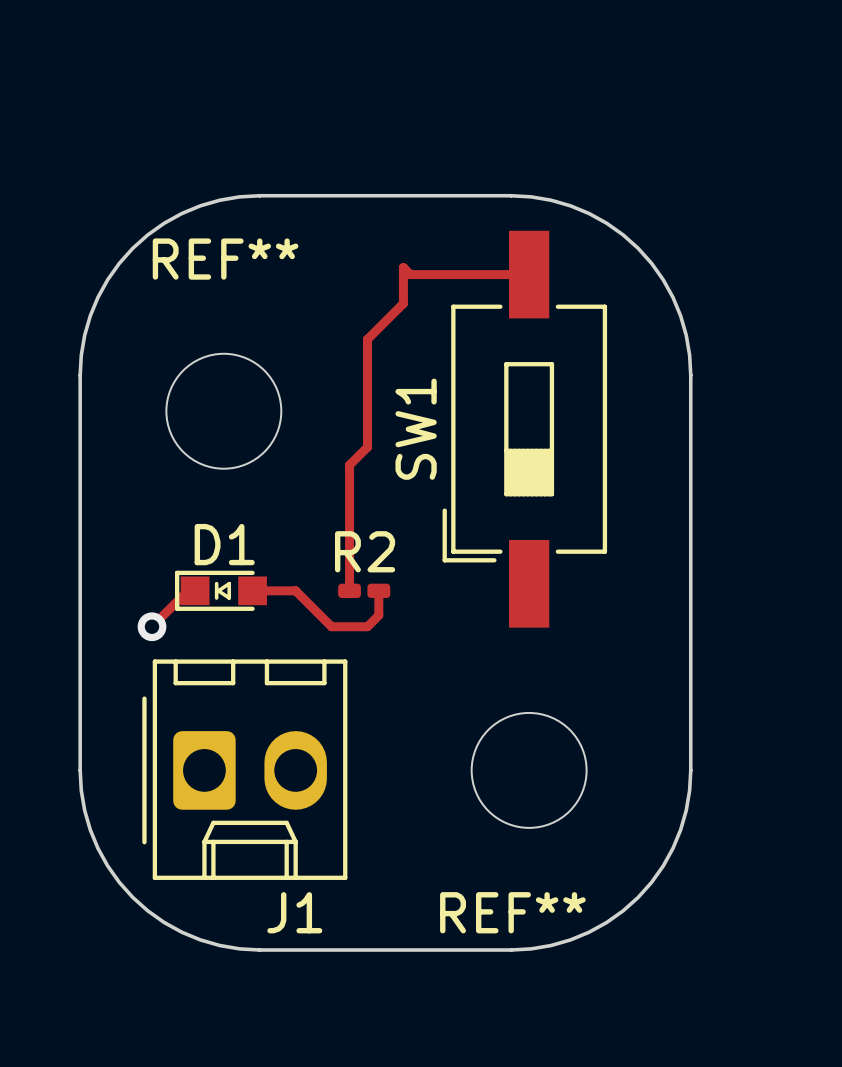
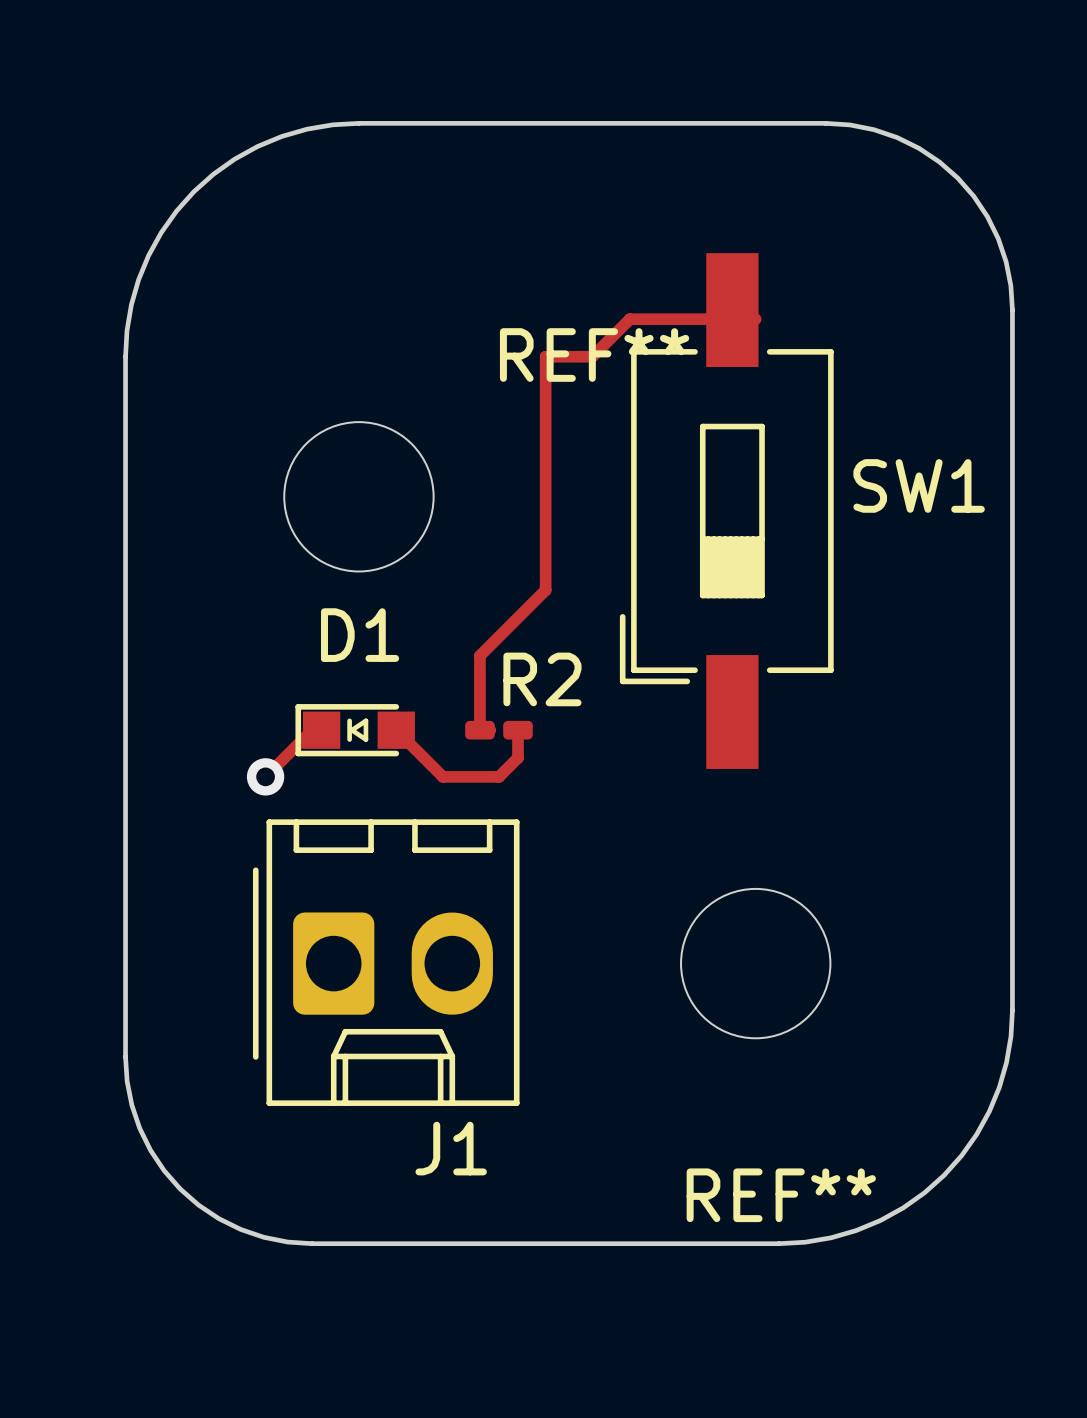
board edge: (259, 195) (511, 195) (551, 200) (589, 213) (623, 234) (651, 263) (672, 297) (686, 335) (690, 375) (689, 790) (680, 829) (663, 865) (638, 897) (623, 910) (589, 932) (551, 945) (511, 950) (259, 950) (219, 945) (181, 932) (147, 910) (119, 882) (97, 848) (84, 810) (80, 770) (80, 375) (84, 335) (90, 316) (107, 279) (119, 263) (147, 234) (181, 213) (200, 205) (219, 200) (259, 195) -> (358, 123) (332, 124) (281, 136) (257, 146) (213, 174) (193, 191) (161, 232) (148, 255) (131, 304) (125, 356) (125, 1056) (127, 1081) (131, 1105) (139, 1128) (150, 1150) (164, 1170) (180, 1188) (198, 1205) (218, 1218) (240, 1229) (263, 1237) (287, 1242) (312, 1243) (779, 1243) (831, 1237) (880, 1220) (924, 1192) (944, 1175) (976, 1134) (999, 1087) (1010, 1036) (1012, 310) (1010, 285) (1006, 261) (998, 238) (987, 216) (973, 196) (957, 178) (939, 161) (919, 148) (897, 137) (874, 129) (850, 124) (825, 123) (358, 123)
REF** name position: REF** (225, 259) -> REF** (594, 355)
track: (432, 274) (410, 274) (403, 267) (403, 303) (367, 339) -> (629, 319) (592, 356) (545, 356) (545, 403)
SW1 name rotation: 0° (416, 429) -> 90° clockwise (919, 485)
SW1 name position: SW1 (416, 429) -> SW1 (919, 485)
SW1 position: (524, 429) -> (726, 511)
track: (367, 447) (349, 465) (349, 590) -> (545, 543) (545, 590) (479, 655) (479, 730) (490, 730)
D1 name position: D1 (224, 544) -> D1 (360, 635)
track: (252, 590) (295, 590) (331, 626) (367, 626) (378, 615) (378, 590) -> (396, 730) (442, 776) (498, 776) (518, 757) (518, 730)
R2 position: (364, 590) -> (498, 730)
REF** name position: REF** (512, 912) -> REF** (781, 1195)

